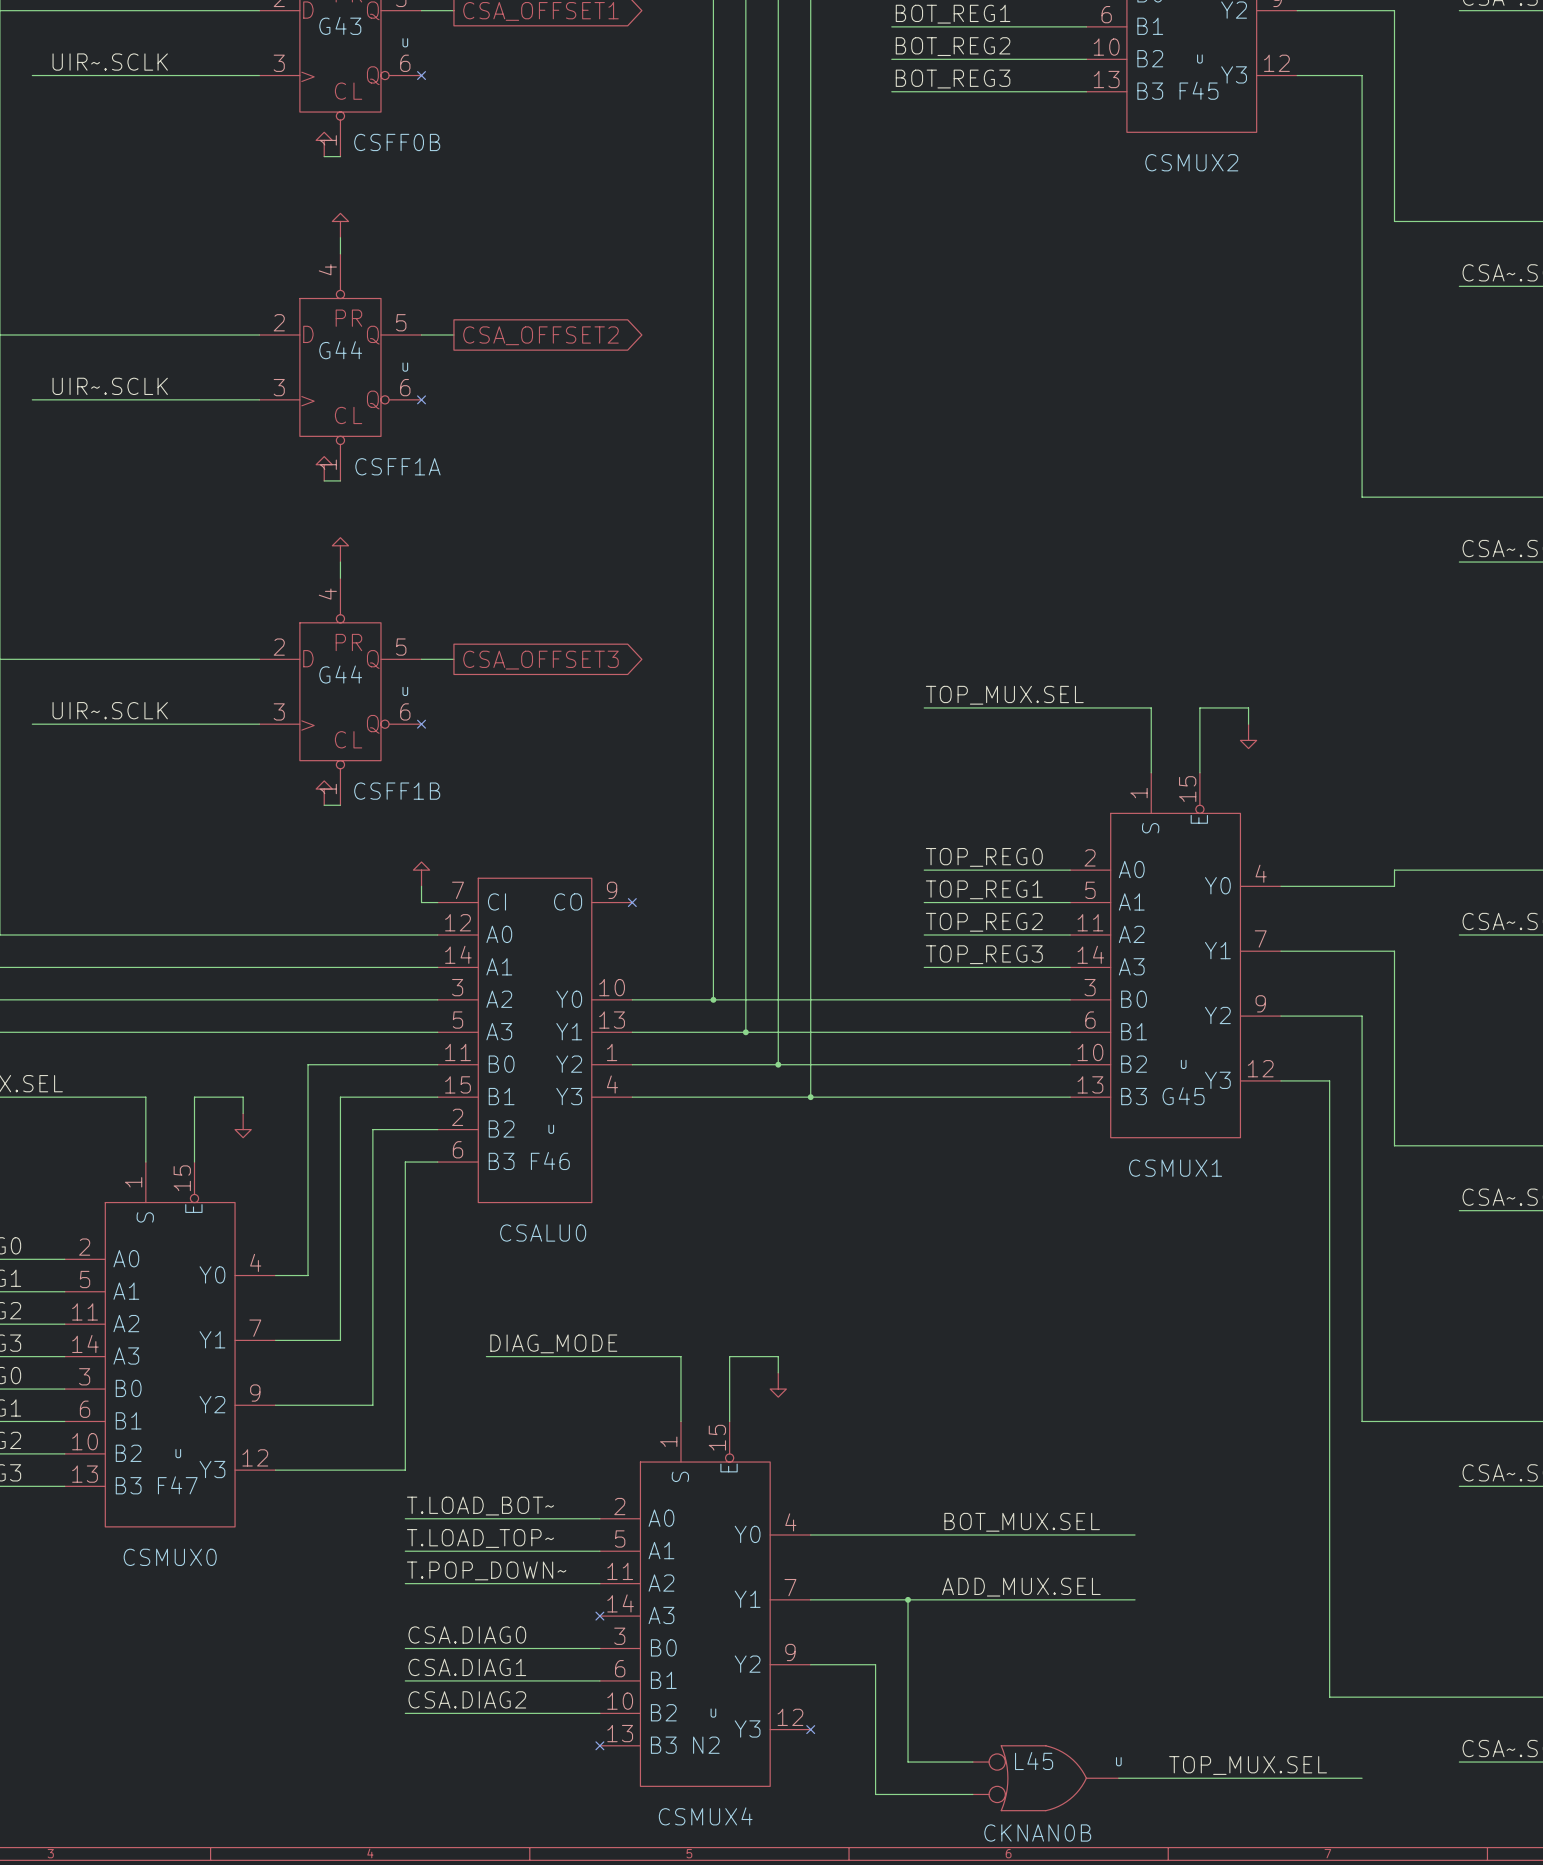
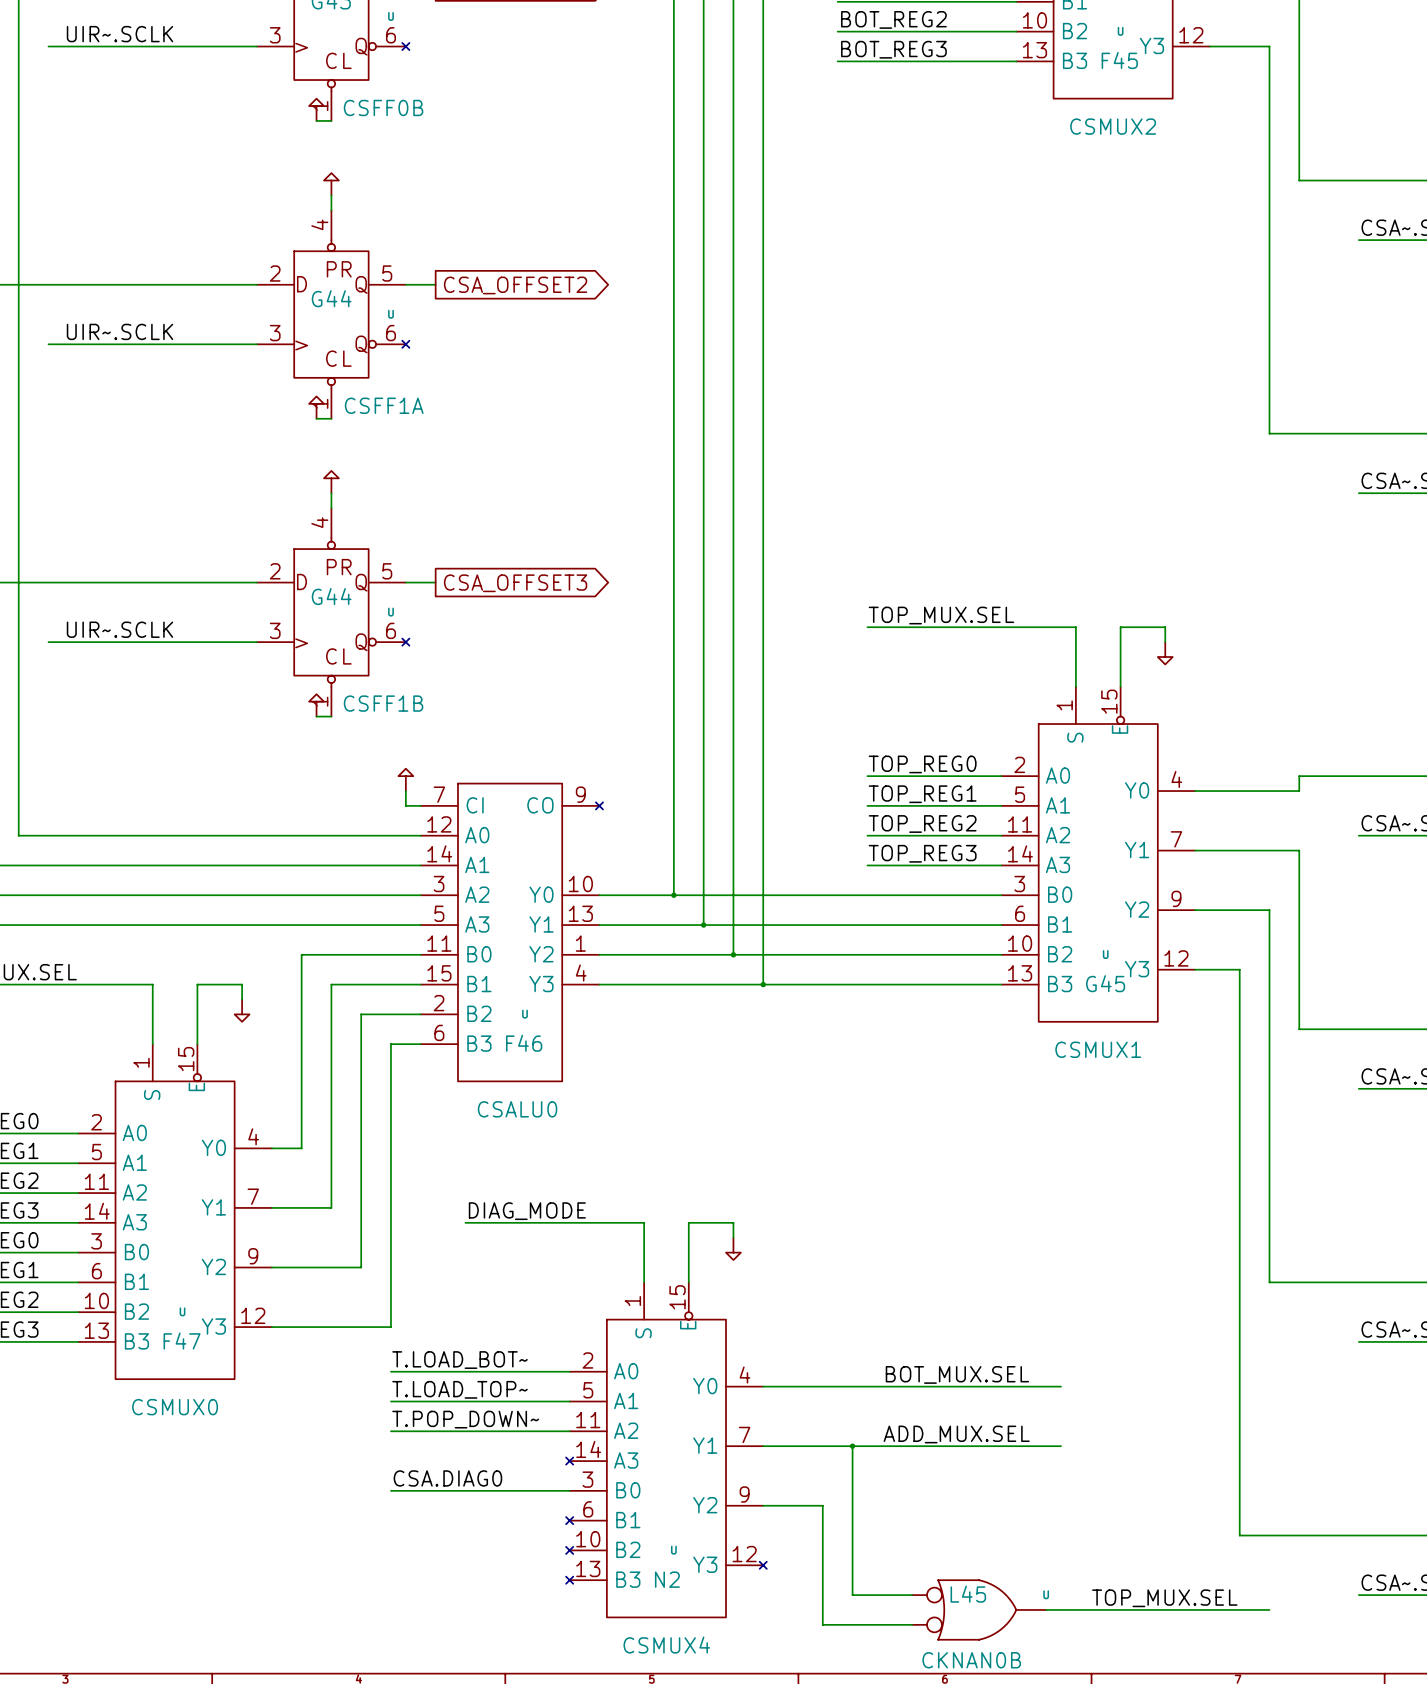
label: CSA.DIAG1 (467, 1667) -> none
wire: (405, 1680) (599, 1680) -> none
no-connect mark: none -> (569, 1520)
label: CSA.DIAG2 (467, 1699) -> none
wire: (405, 1713) (599, 1713) -> none
no-connect mark: none -> (569, 1550)

